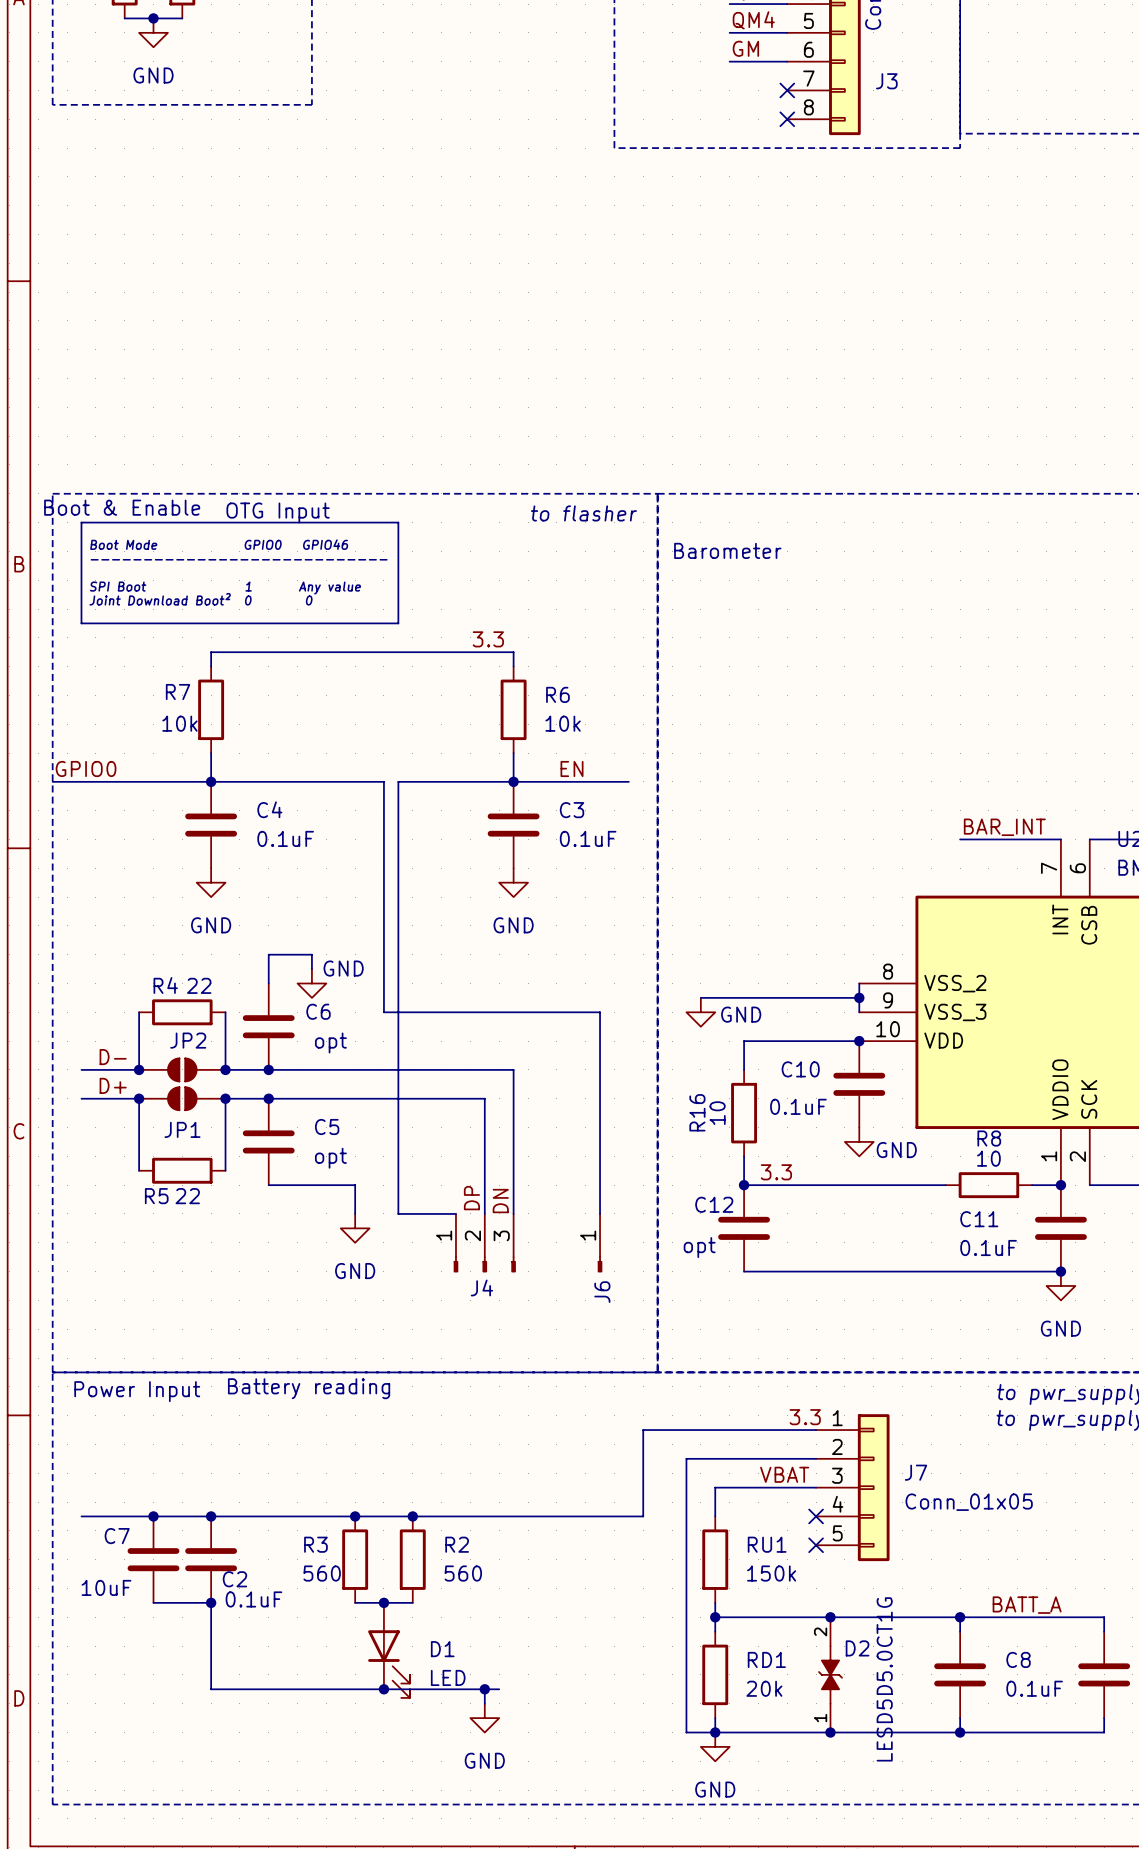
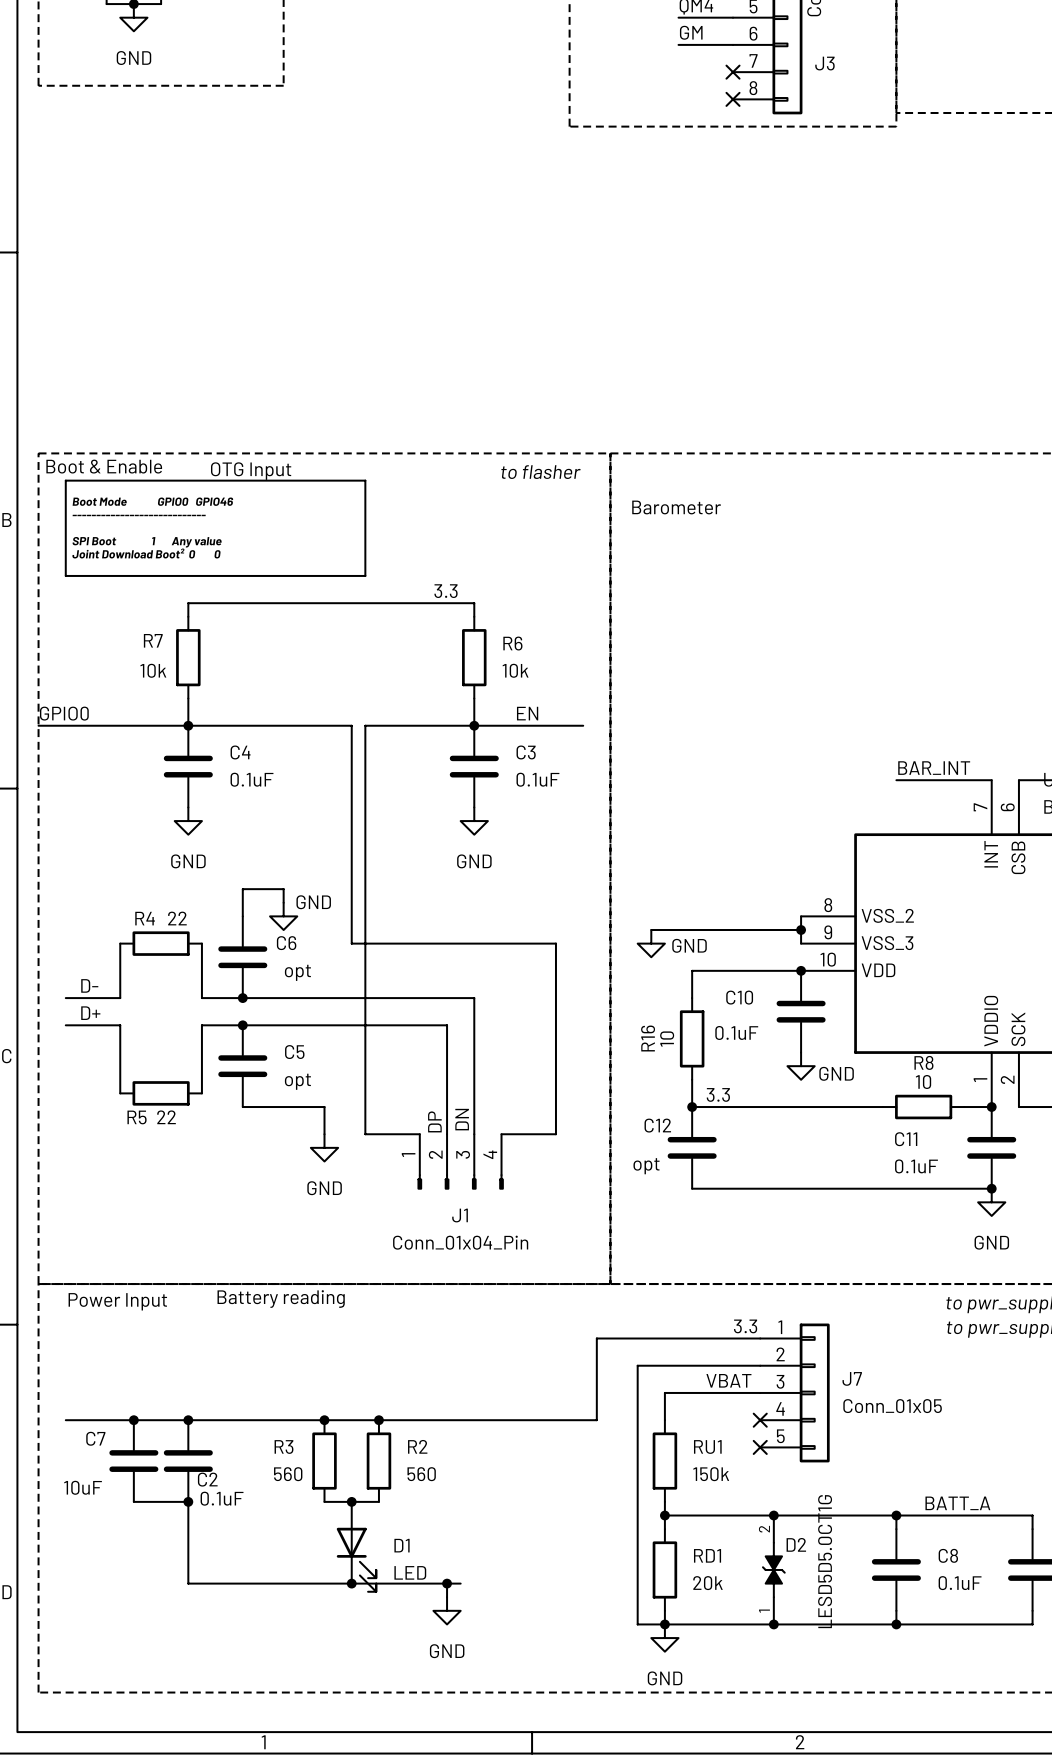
junction: (139, 1069) -> none
JP2: (182, 1069) -> none
junction: (225, 1069) -> none
junction: (139, 1098) -> none
JP1: (182, 1098) -> none
junction: (225, 1098) -> none
wire: none -> (501, 1134) (555, 1134)
J4: (484, 1243) -> none
J1: none -> Conn_01x04_Pin (460, 1161)
J6: (600, 1243) -> none

